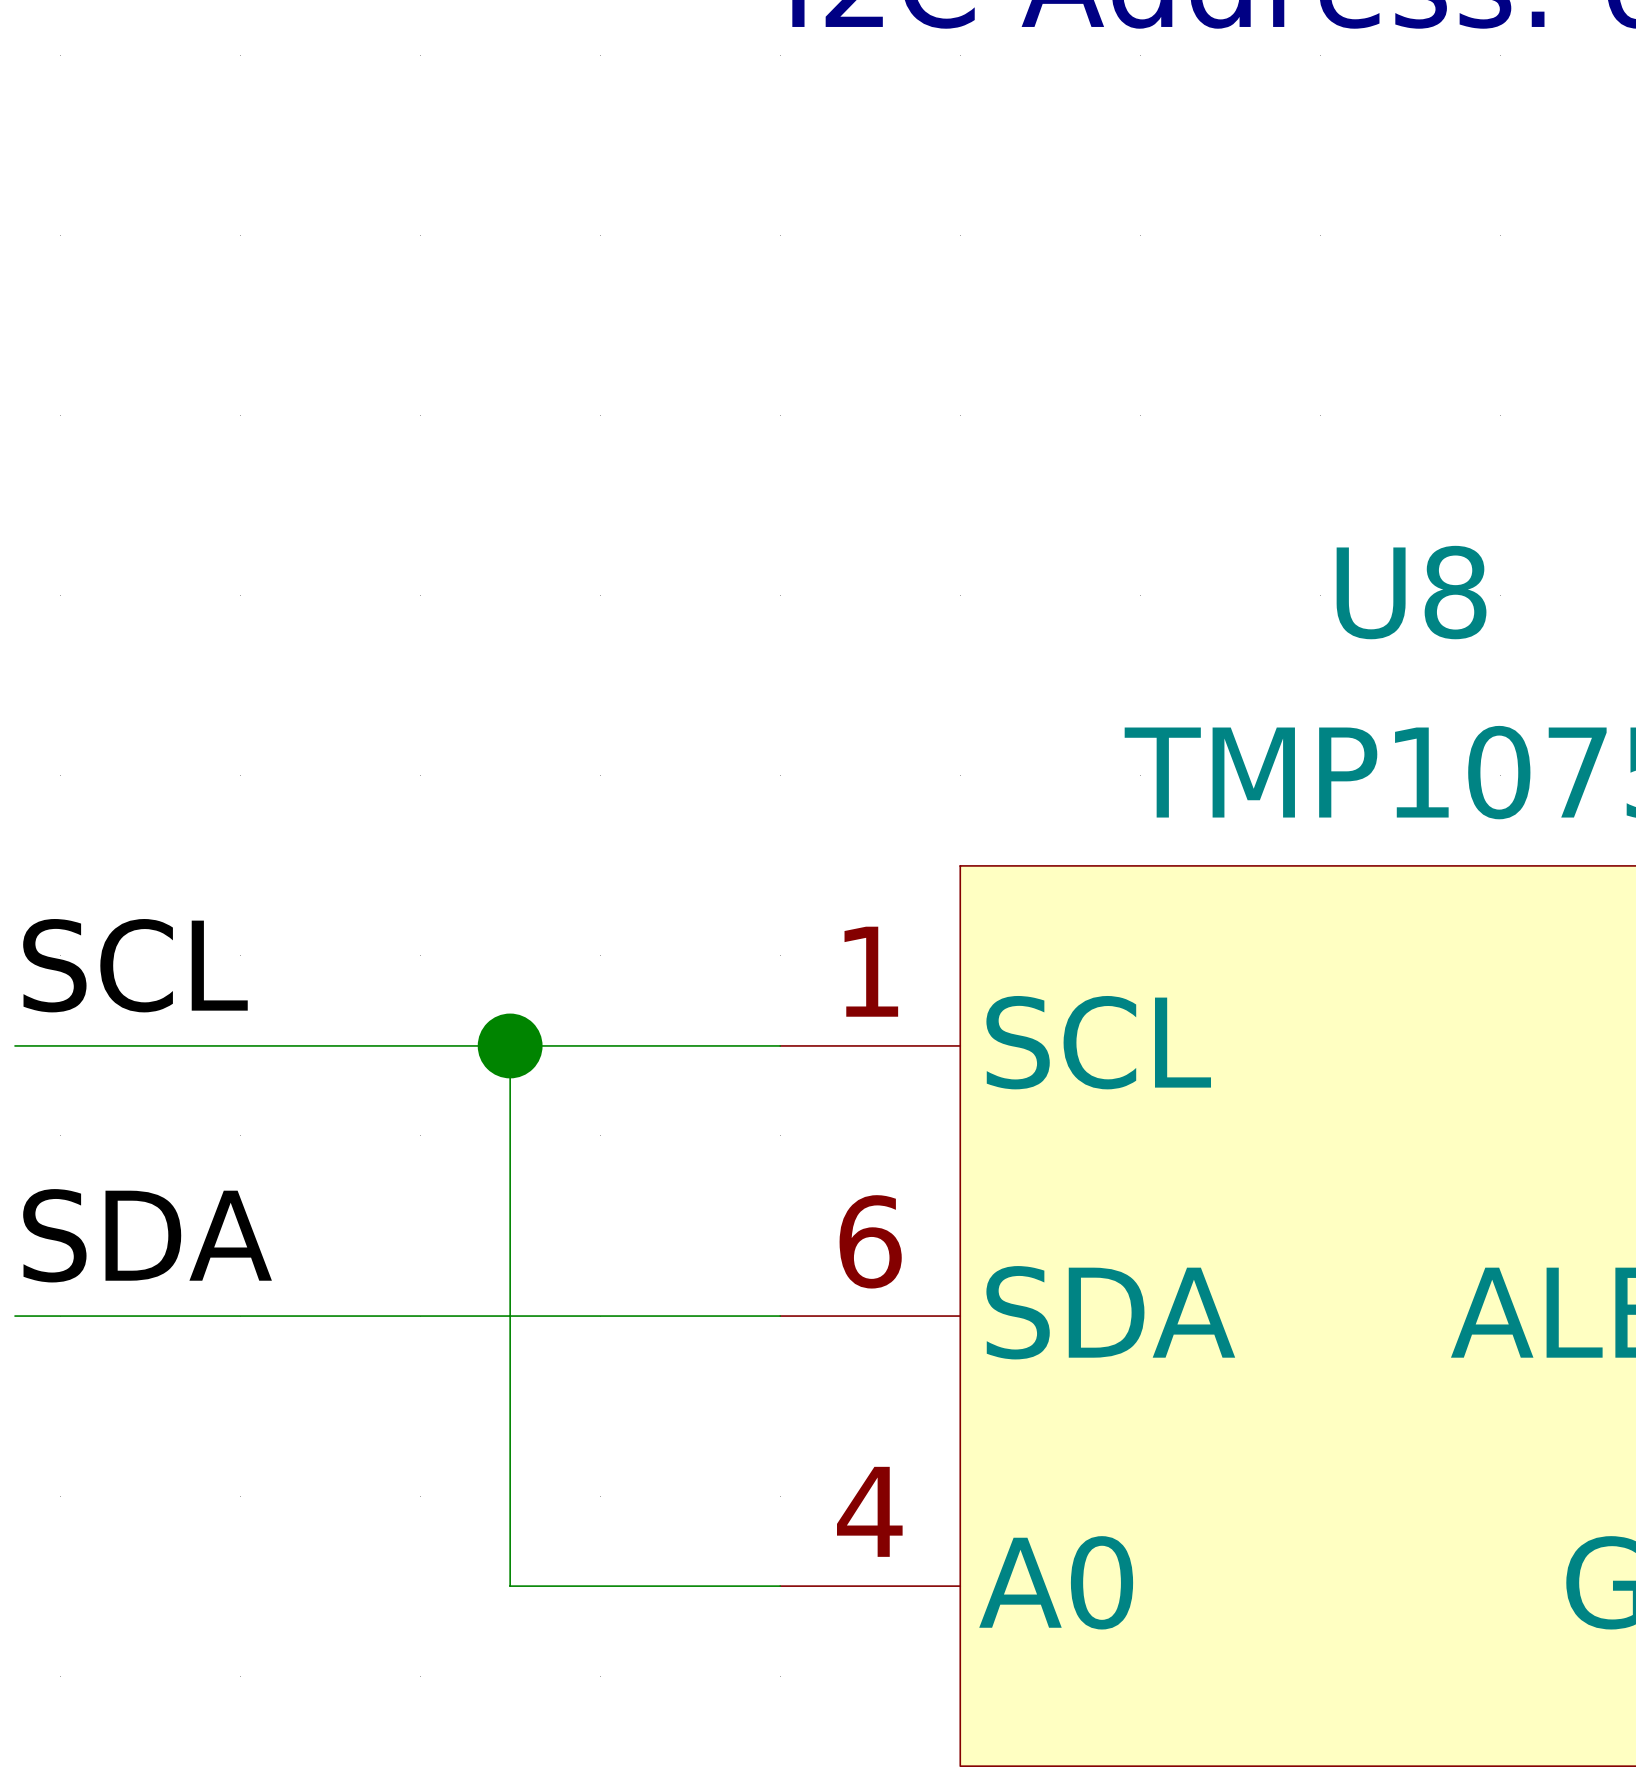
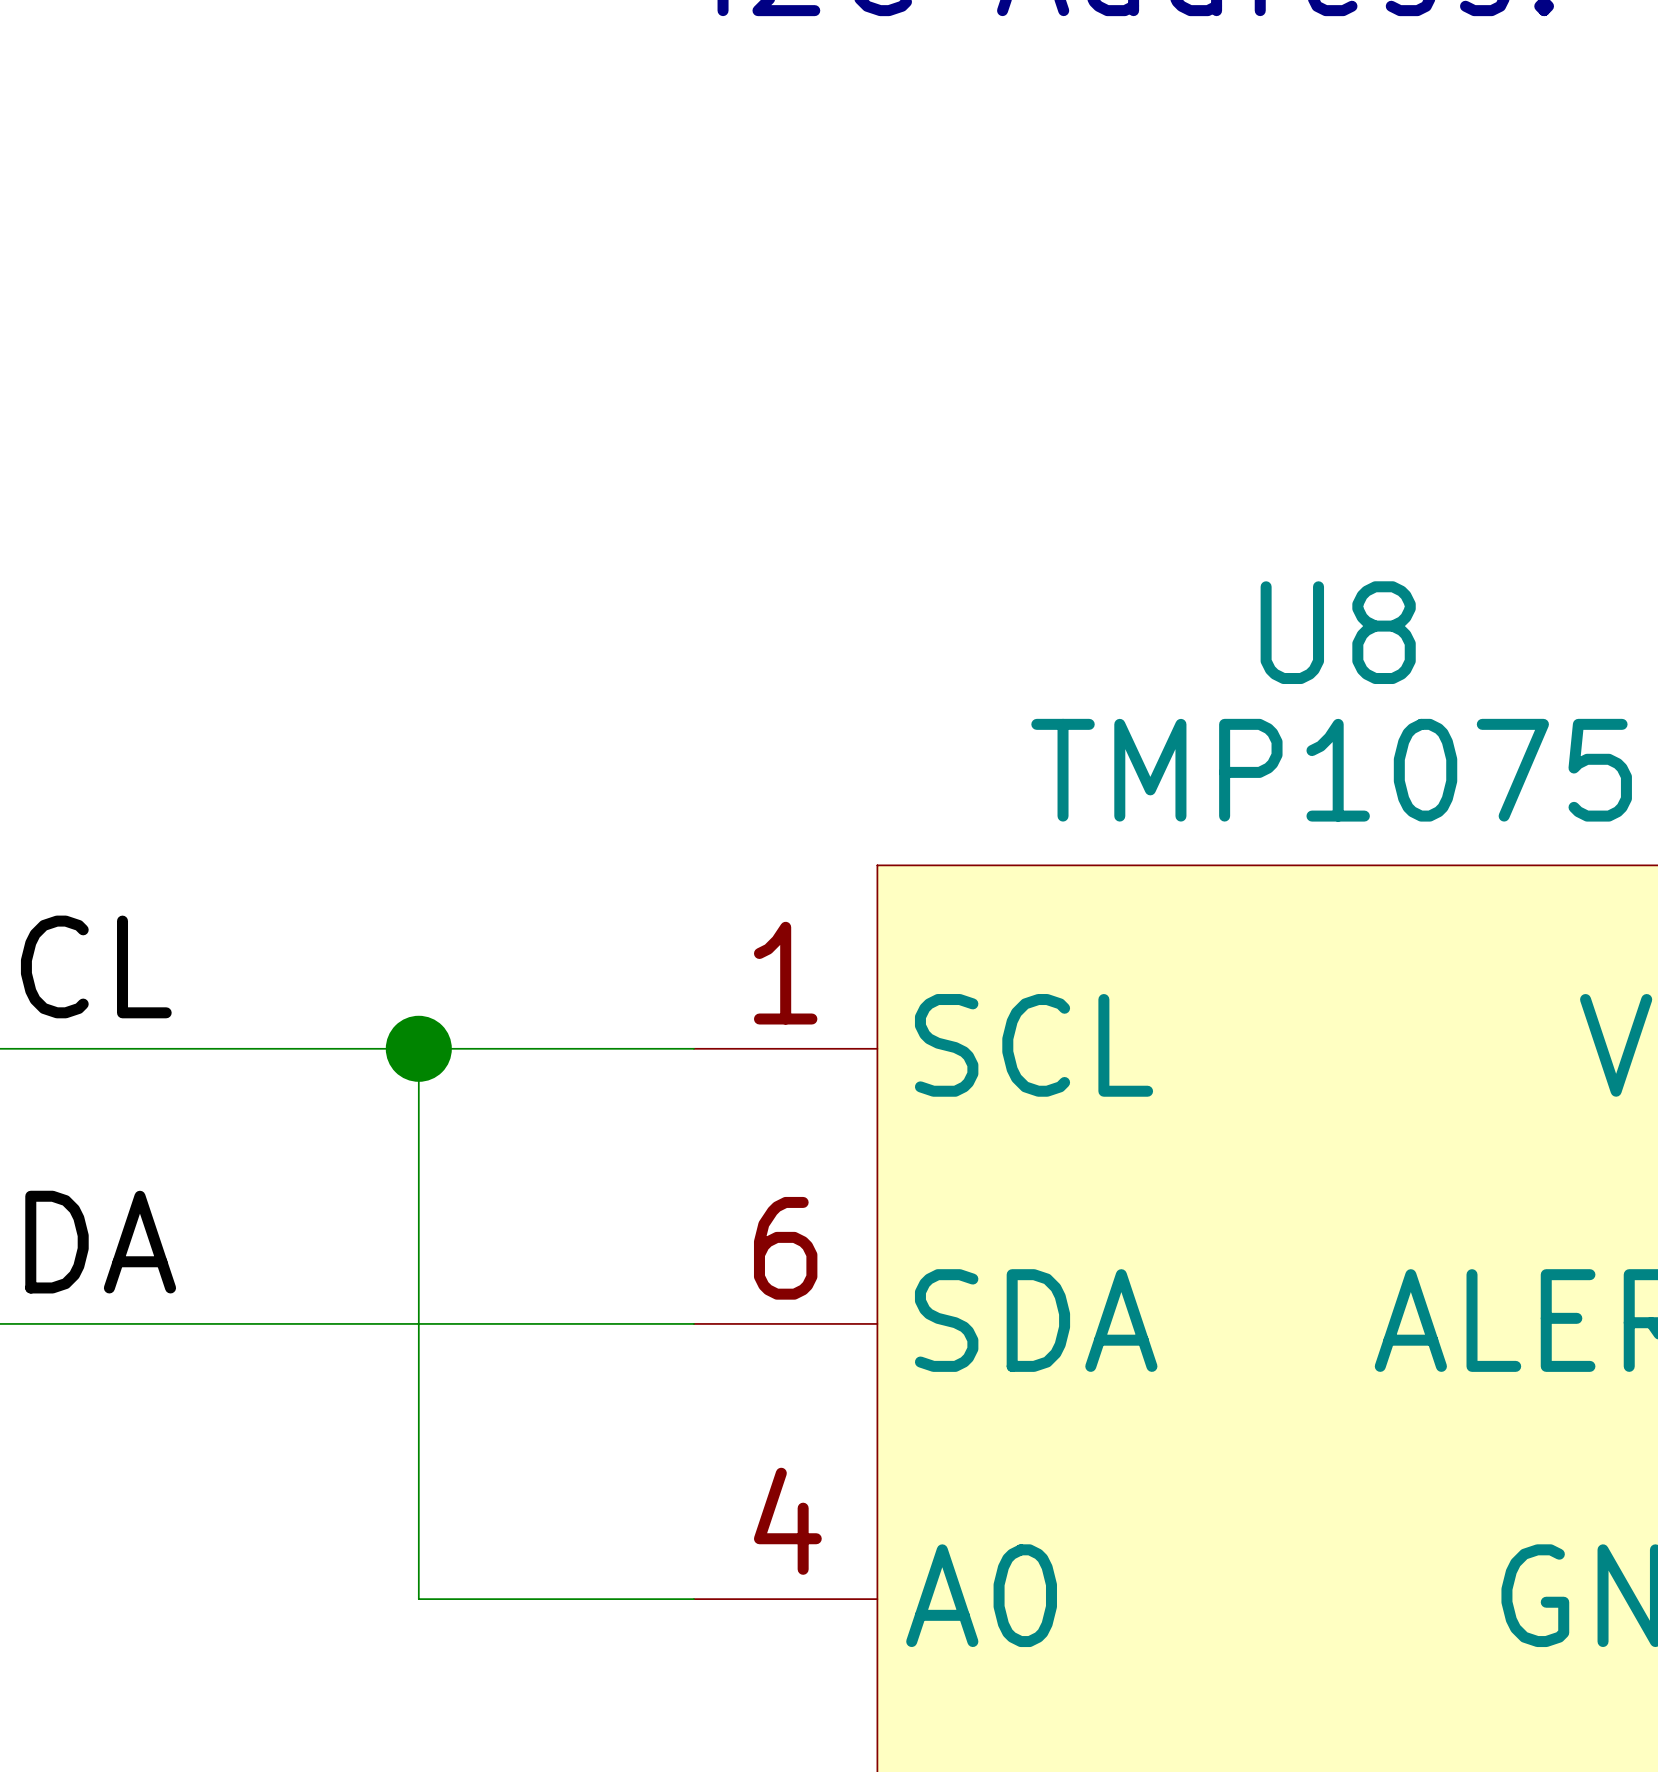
U8 name position: U8 (1411, 592) -> U8 (1338, 632)

